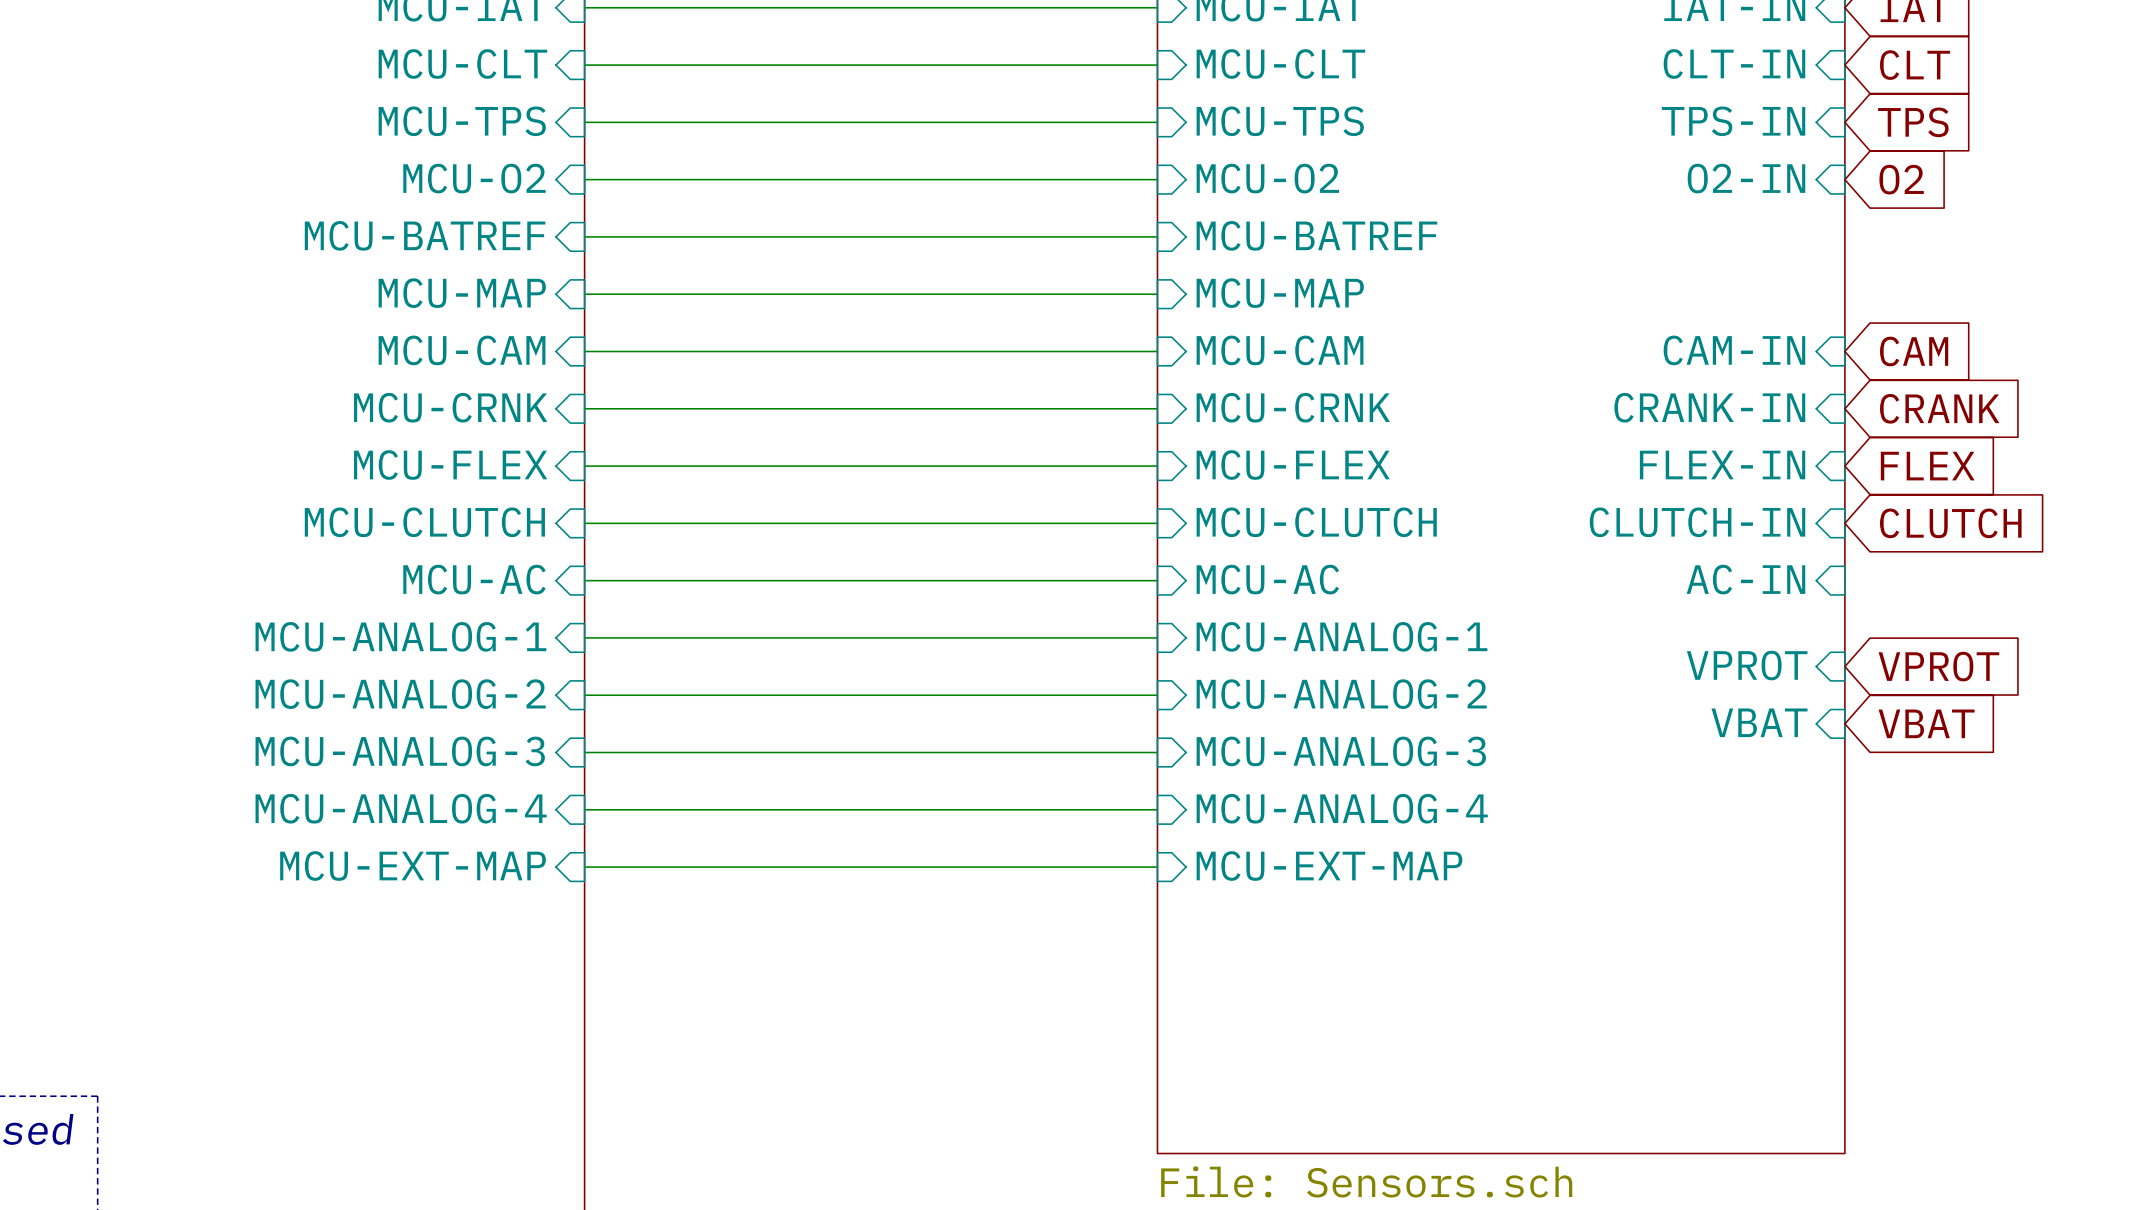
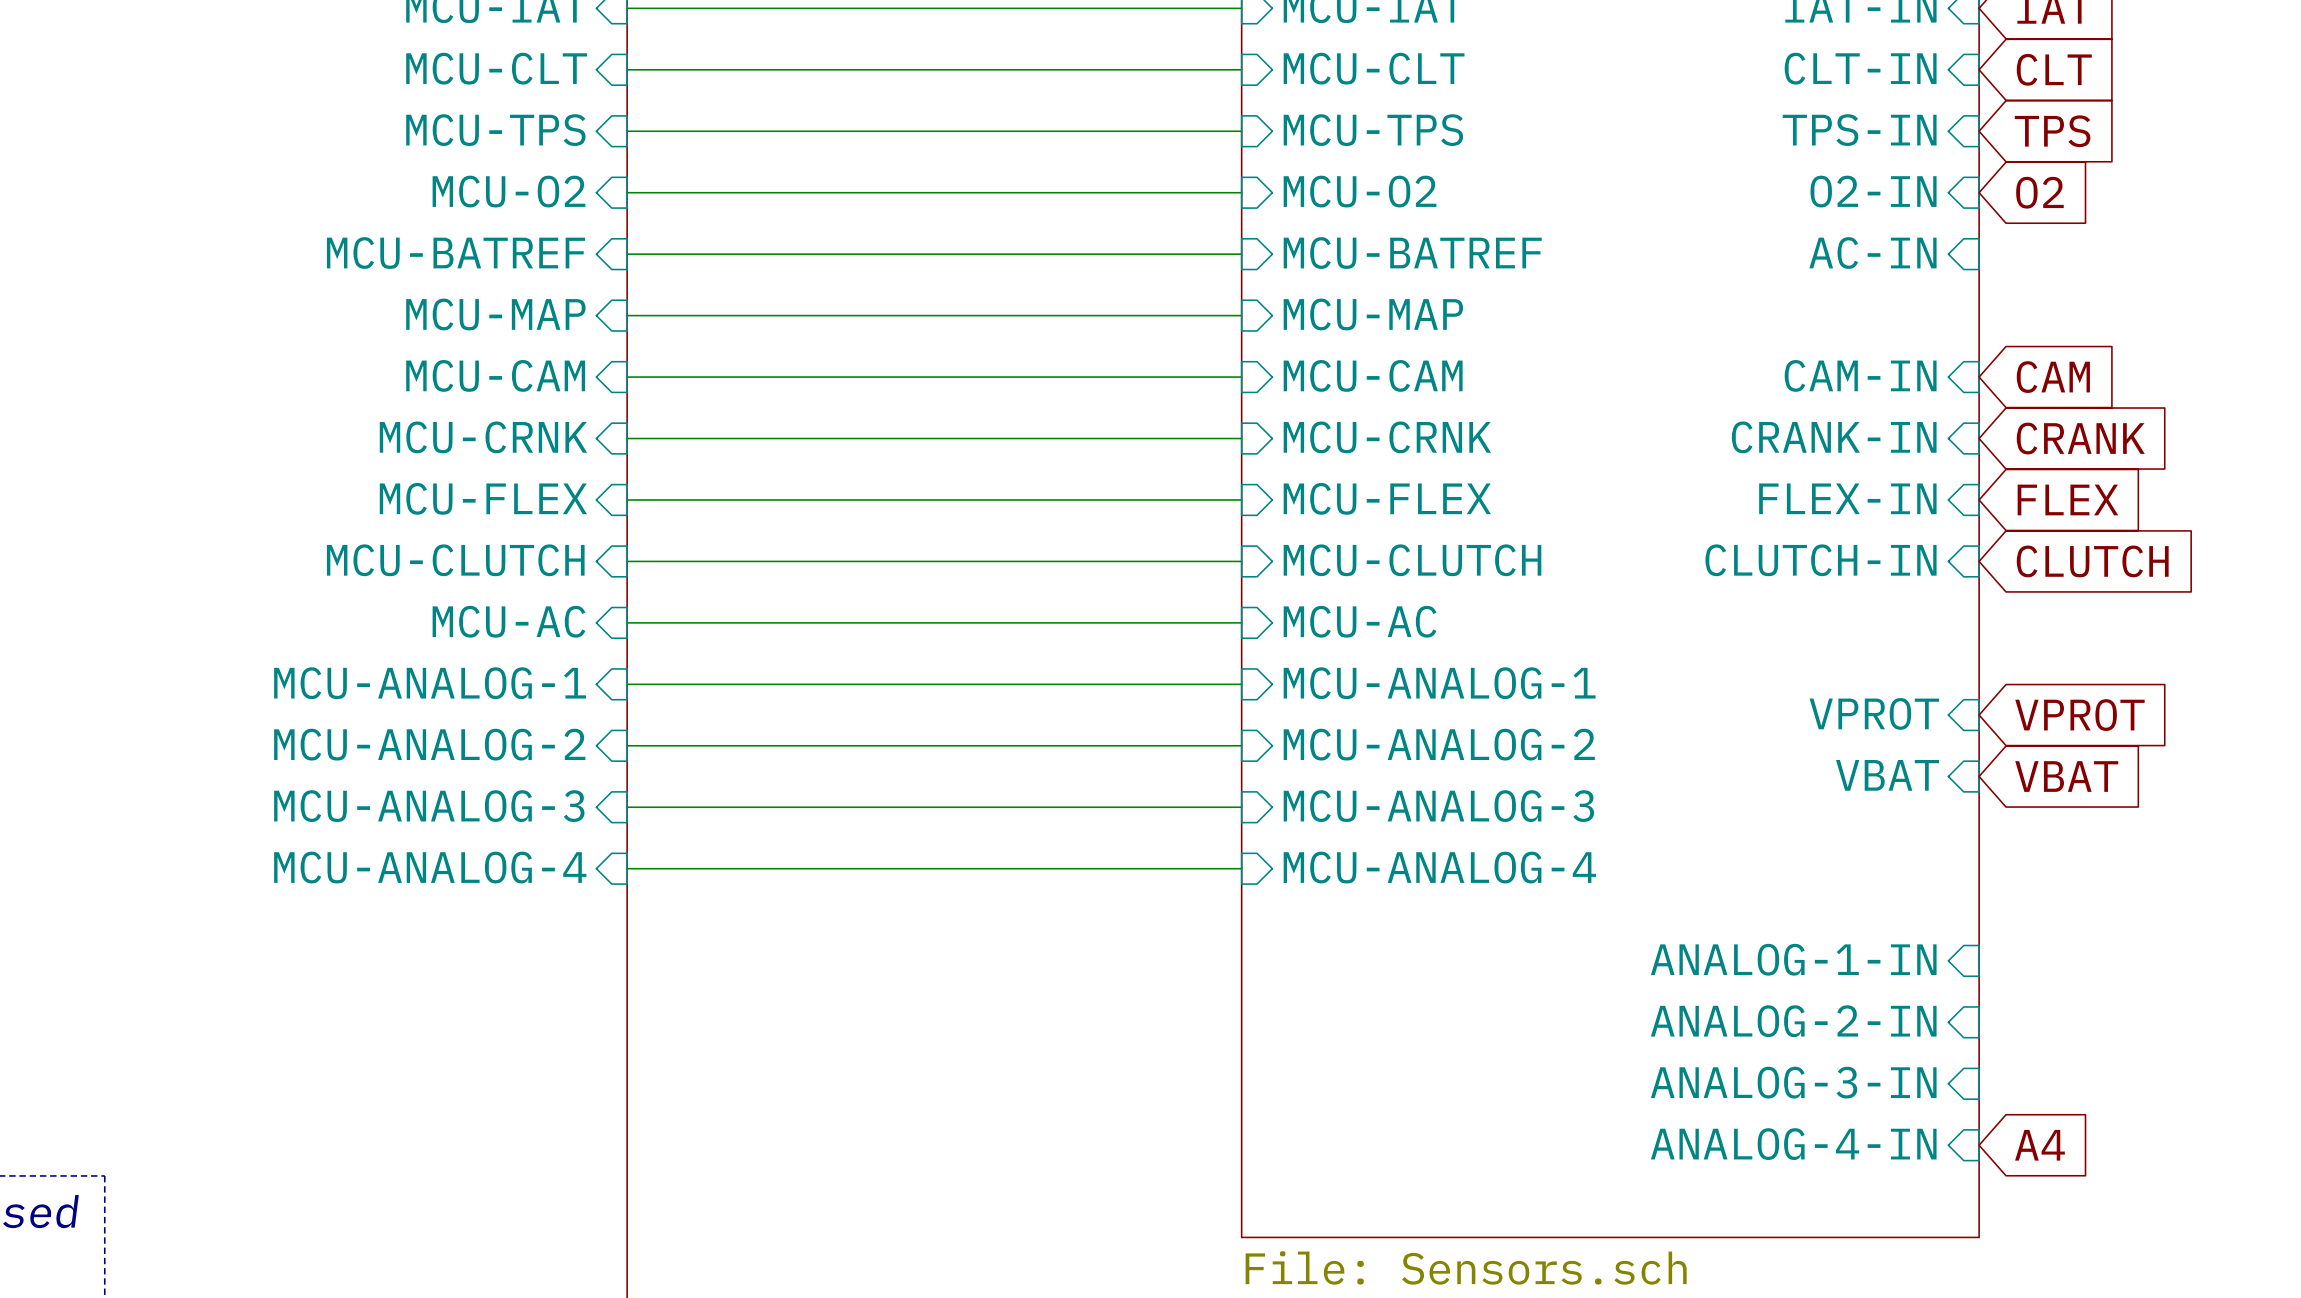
sheet pin position: AC-IN (1745, 579) -> AC-IN (1872, 253)
sheet pin: MCU-EXT-MAP (413, 866) -> none
sheet pin: MCU-EXT-MAP (1329, 866) -> none
wire: (584, 867) (1157, 867) -> none
sheet pin: none -> ANALOG-1-IN (1793, 959)
sheet pin: none -> ANALOG-2-IN (1793, 1021)
sheet pin: none -> ANALOG-3-IN (1793, 1082)
sheet pin: none -> ANALOG-4-IN (1793, 1144)
global label: none -> A4 (2039, 1145)

